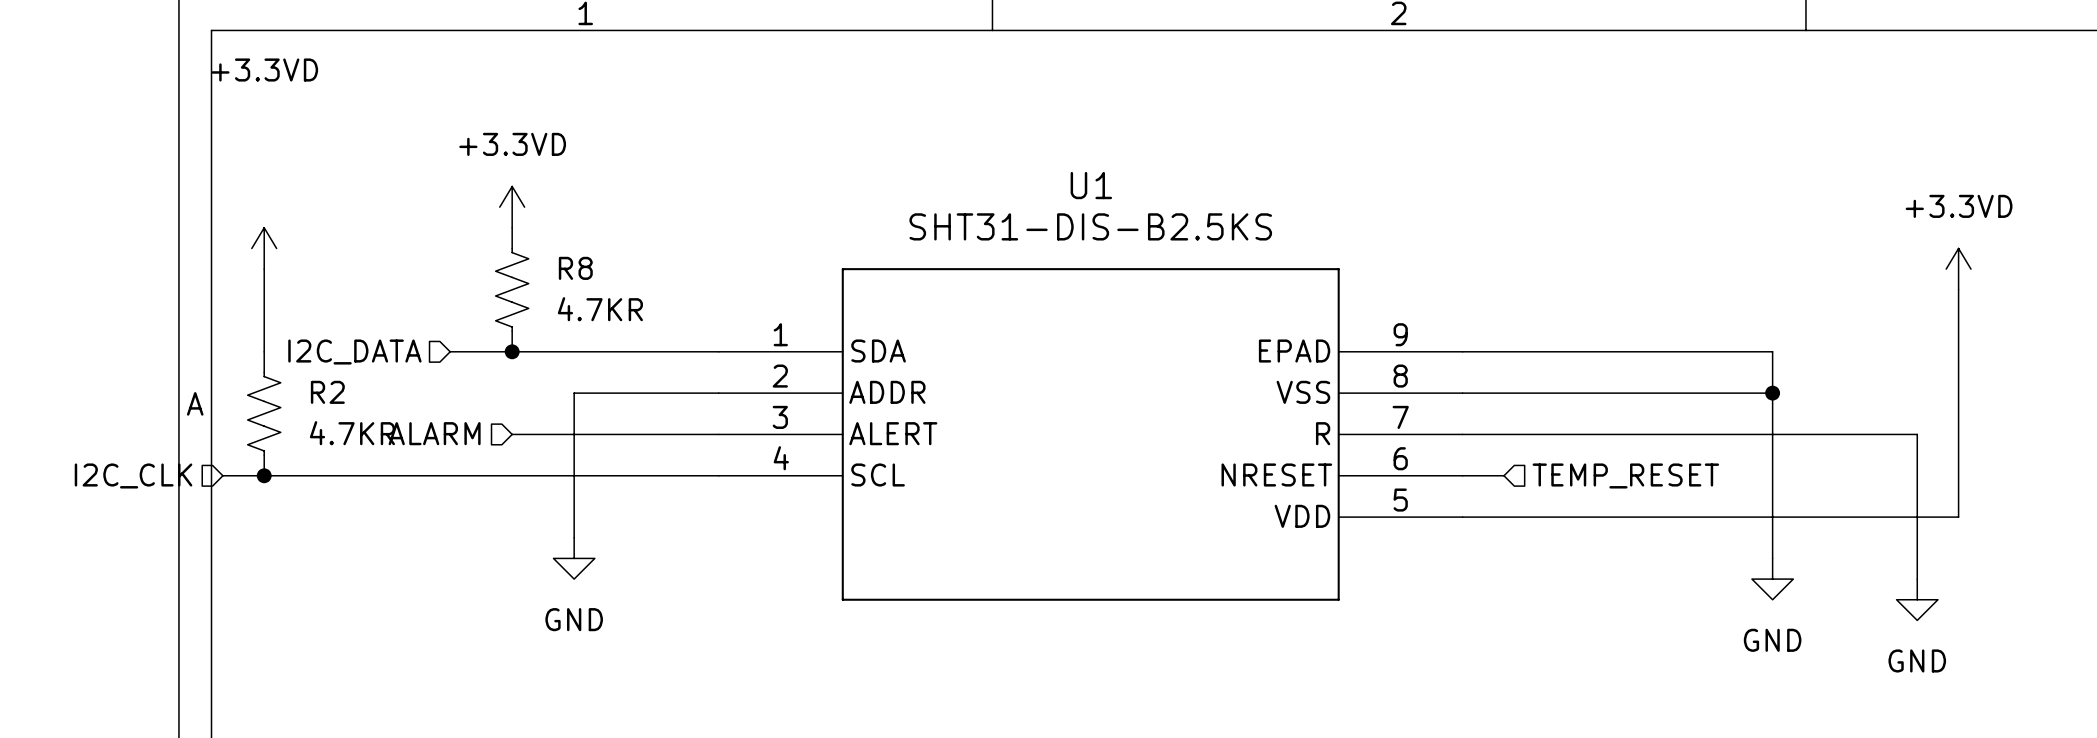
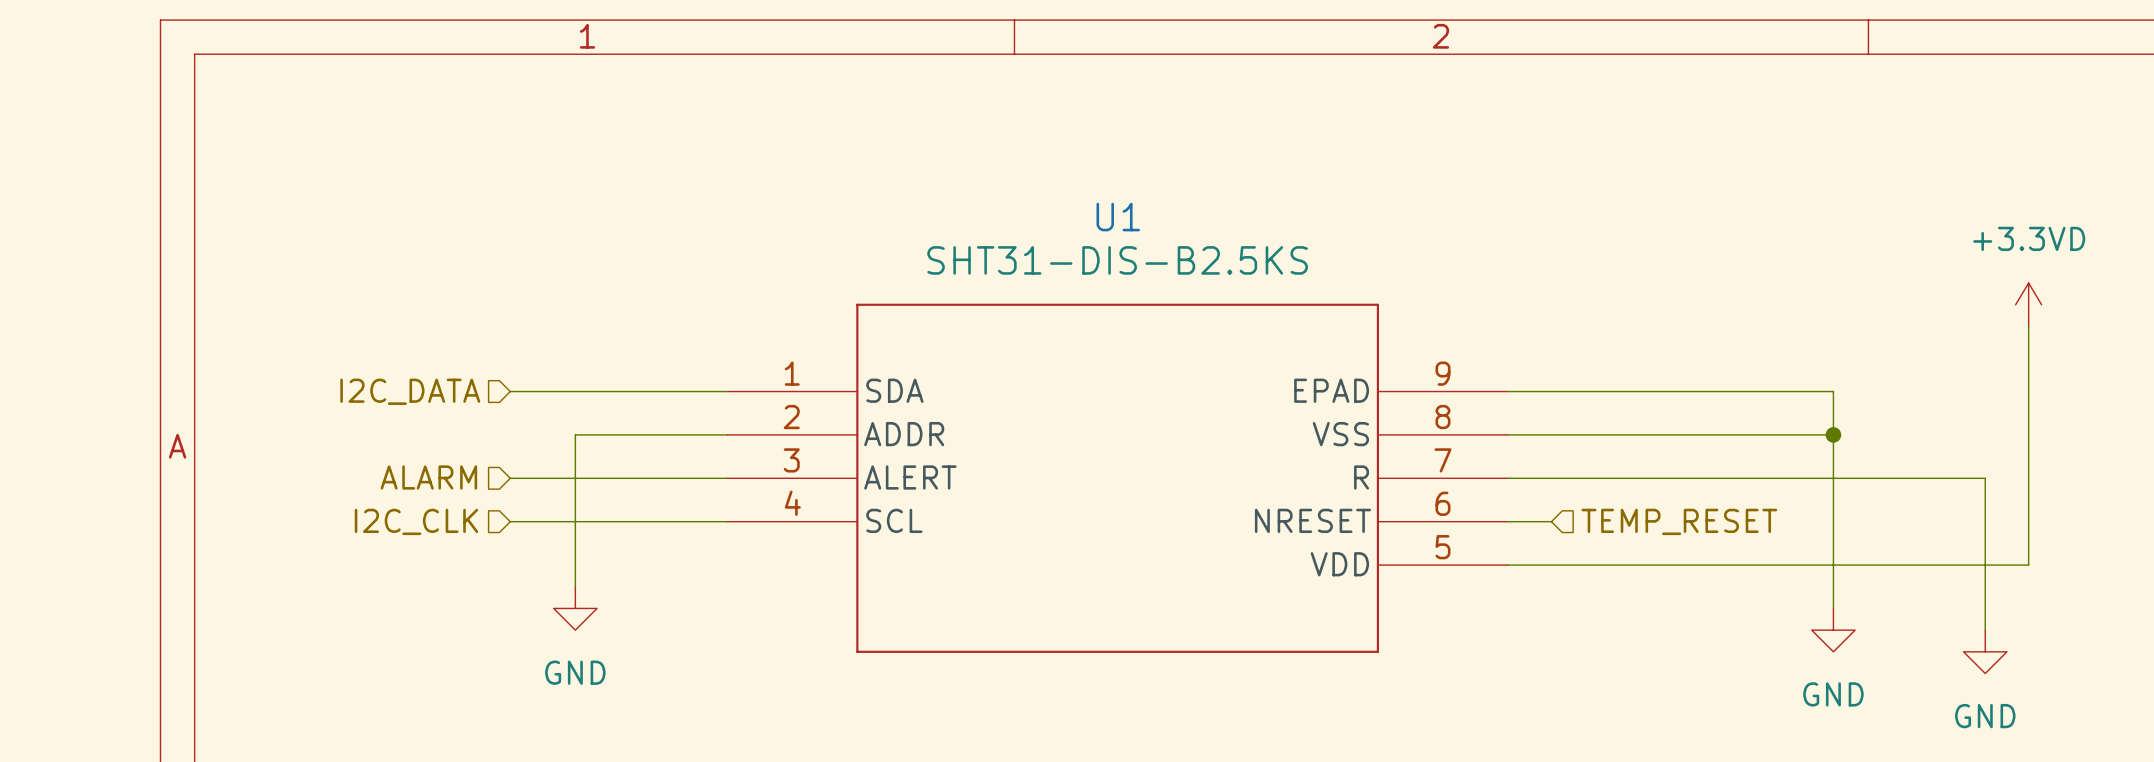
power symbol: +3.3VD (512, 207) -> none
power symbol: +3.3VD (264, 248) -> none
wire: (264, 269) (264, 351) -> none
R8: 4.7KR (512, 289) -> none
wire: (450, 351) (512, 351) -> none
junction: (512, 351) -> none
hierarchical label position: I2C_DATA (354, 352) -> I2C_DATA (410, 391)
R2: 4.7KR (264, 413) -> none
hierarchical label position: I2C_CLK (133, 475) -> I2C_CLK (416, 521)
wire: (222, 475) (512, 475) -> none
junction: (264, 475) -> none

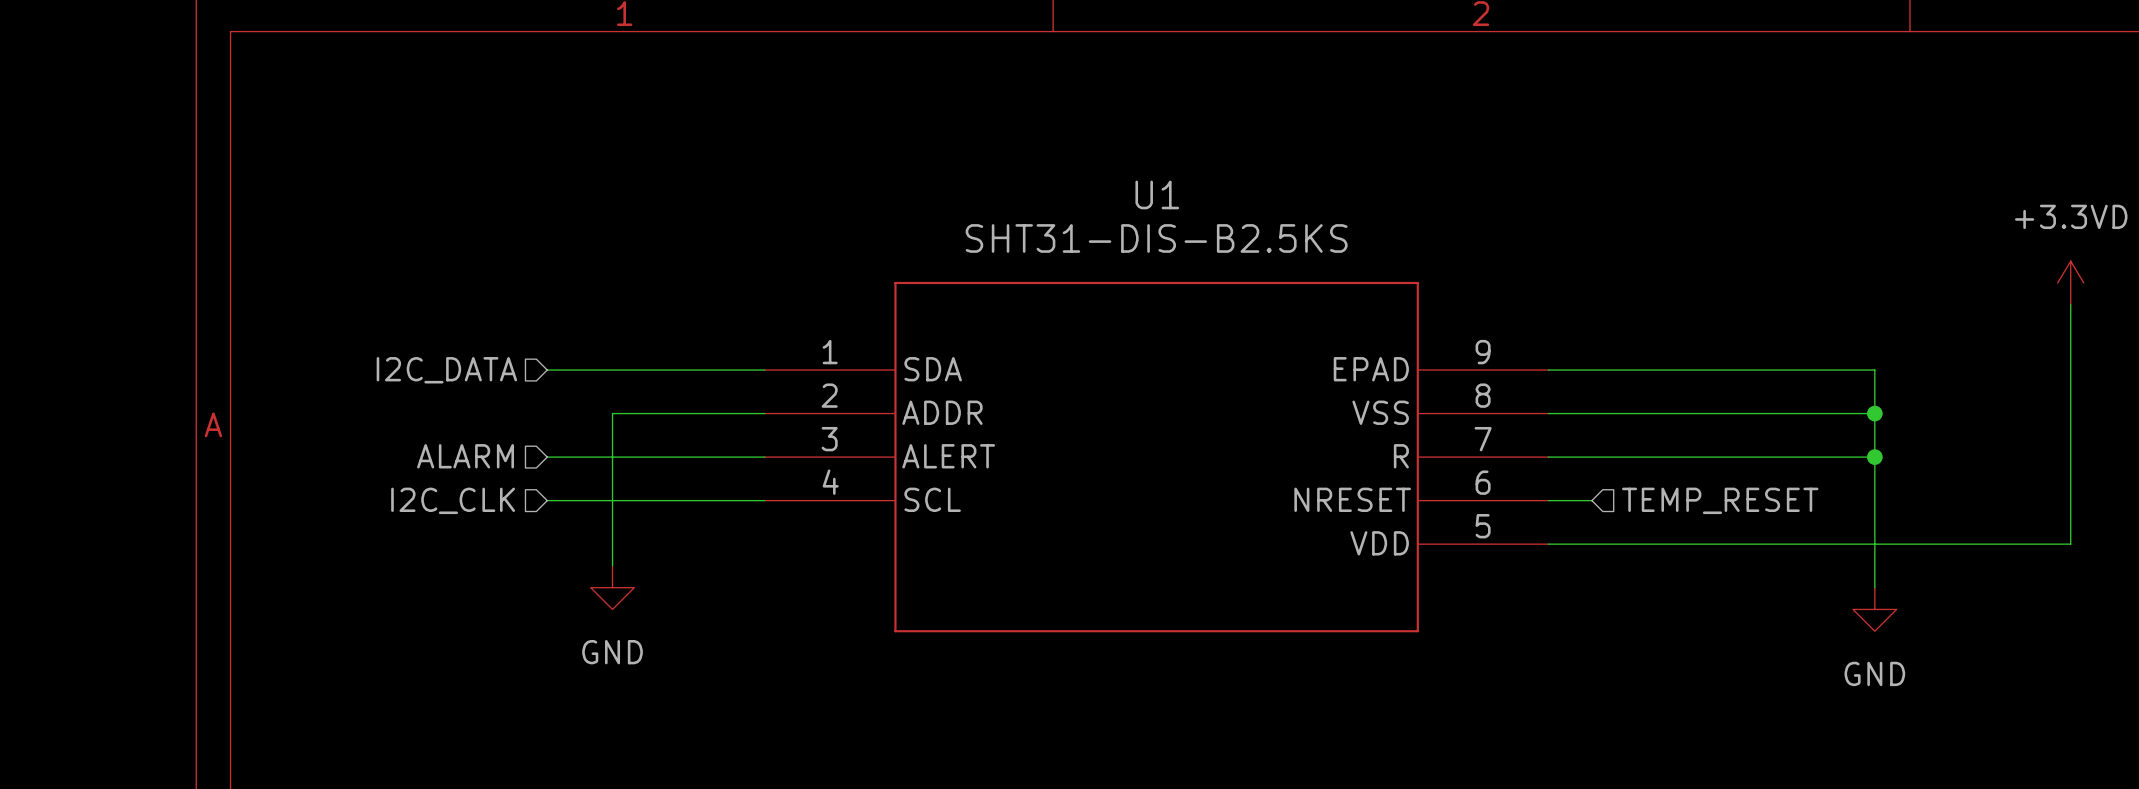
wire: (1833, 478) (1985, 478) (1985, 630) -> none
junction: none -> (1874, 457)
power symbol: GND (1985, 651) -> none

